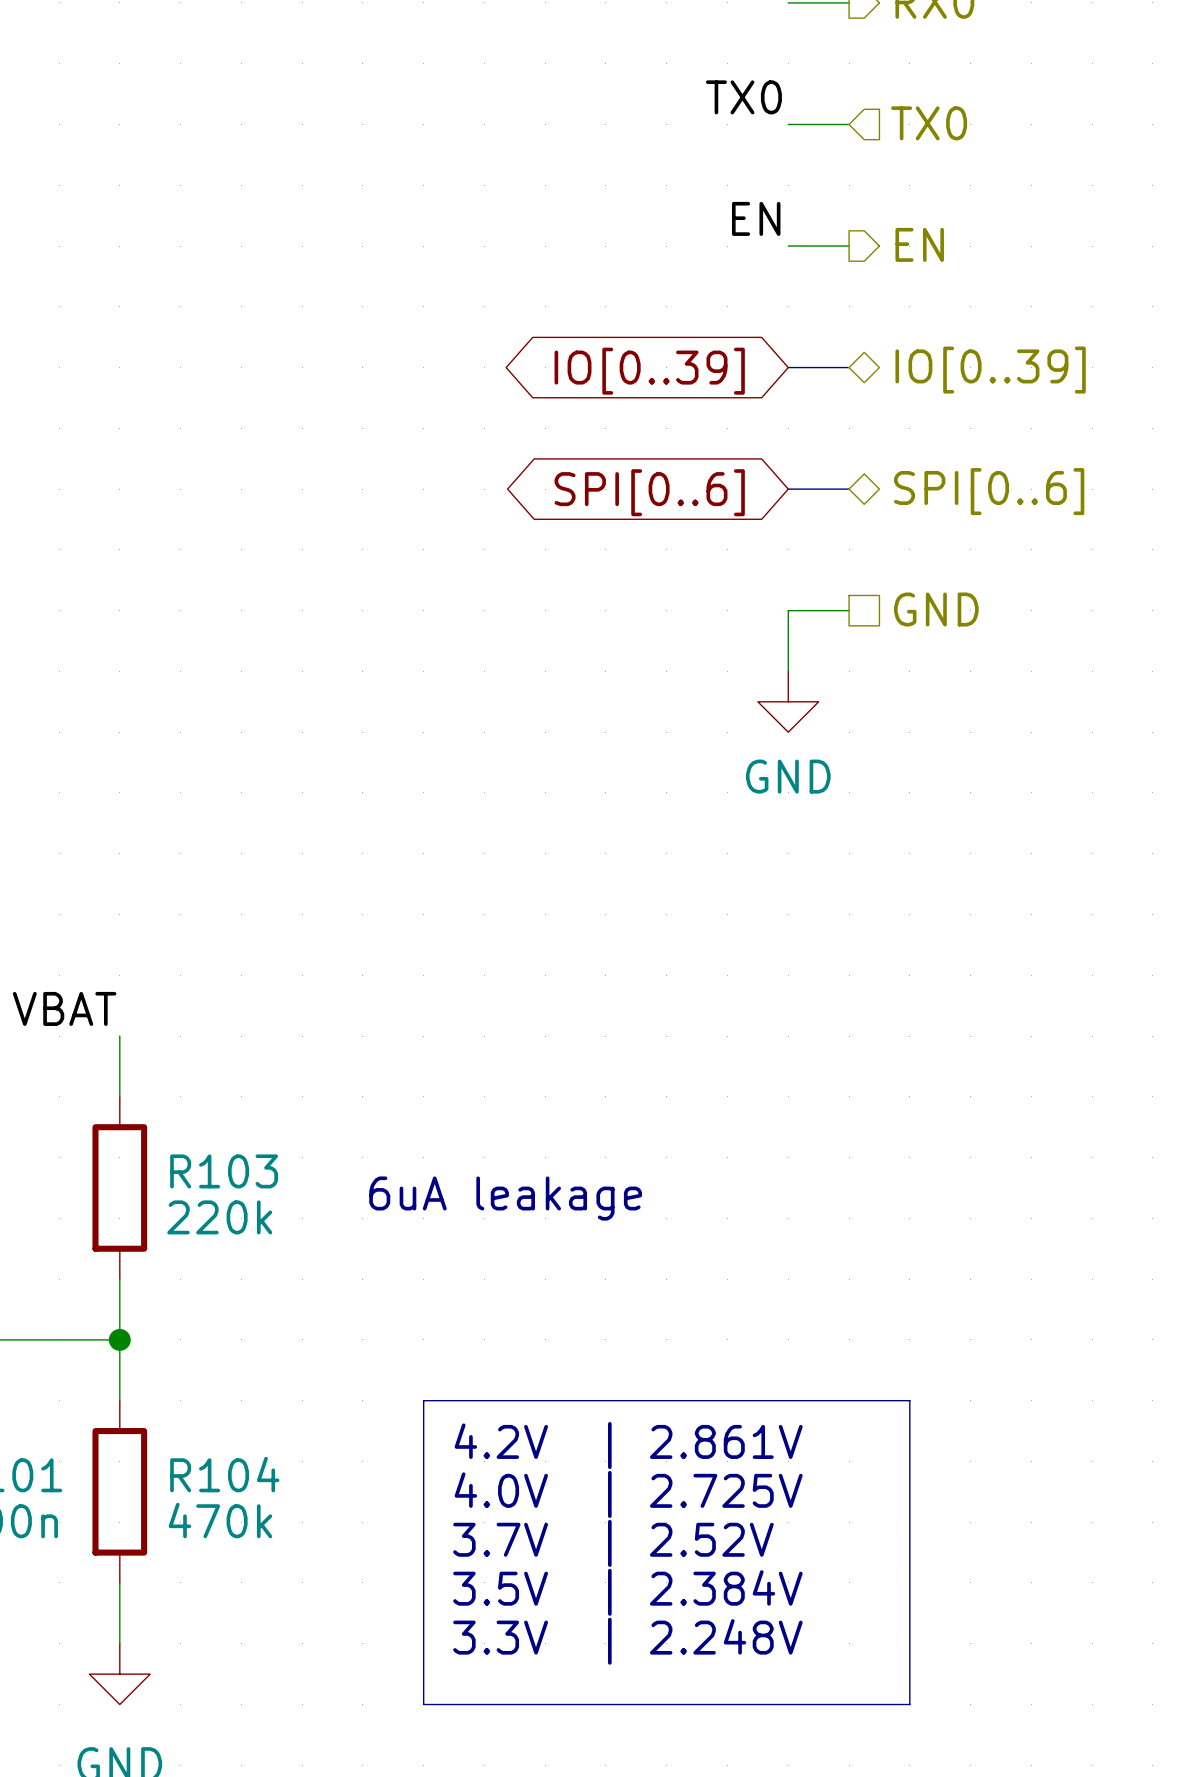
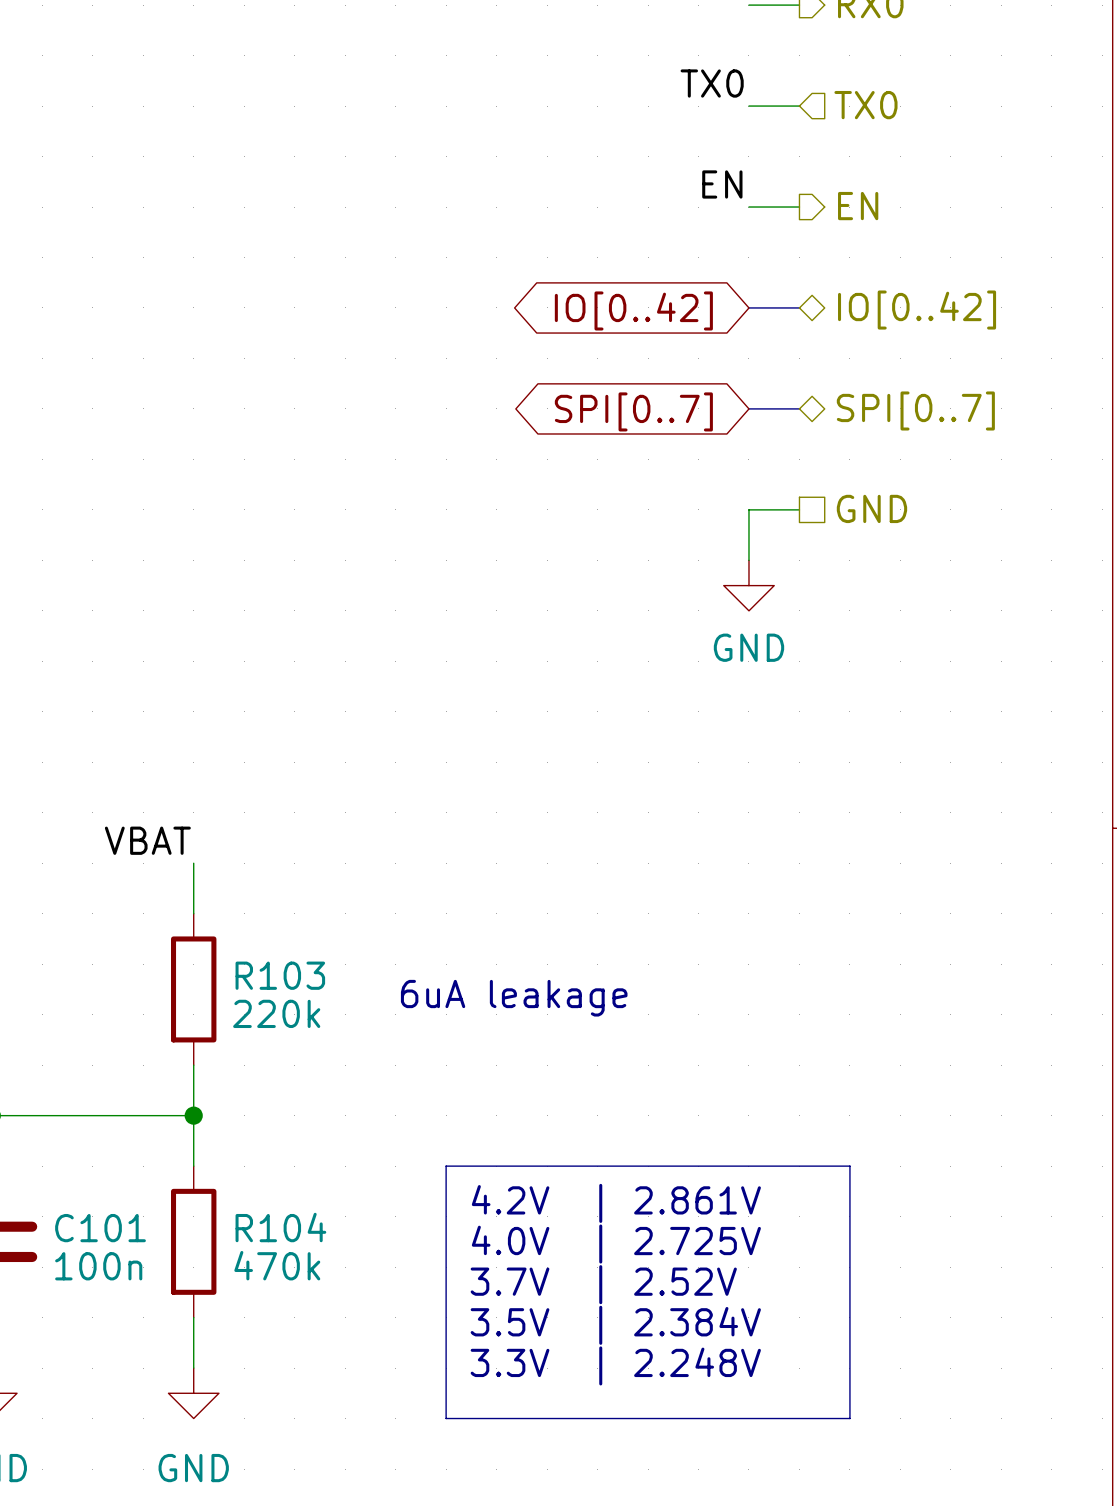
hierarchical label: IO[0..39] (990, 370) -> IO[0..42] (917, 310)
global label: IO[0..39] (649, 371) -> IO[0..42] (633, 310)
hierarchical label: SPI[0..6] (989, 491) -> SPI[0..7] (915, 410)
global label: SPI[0..6] (649, 492) -> SPI[0..7] (633, 411)

